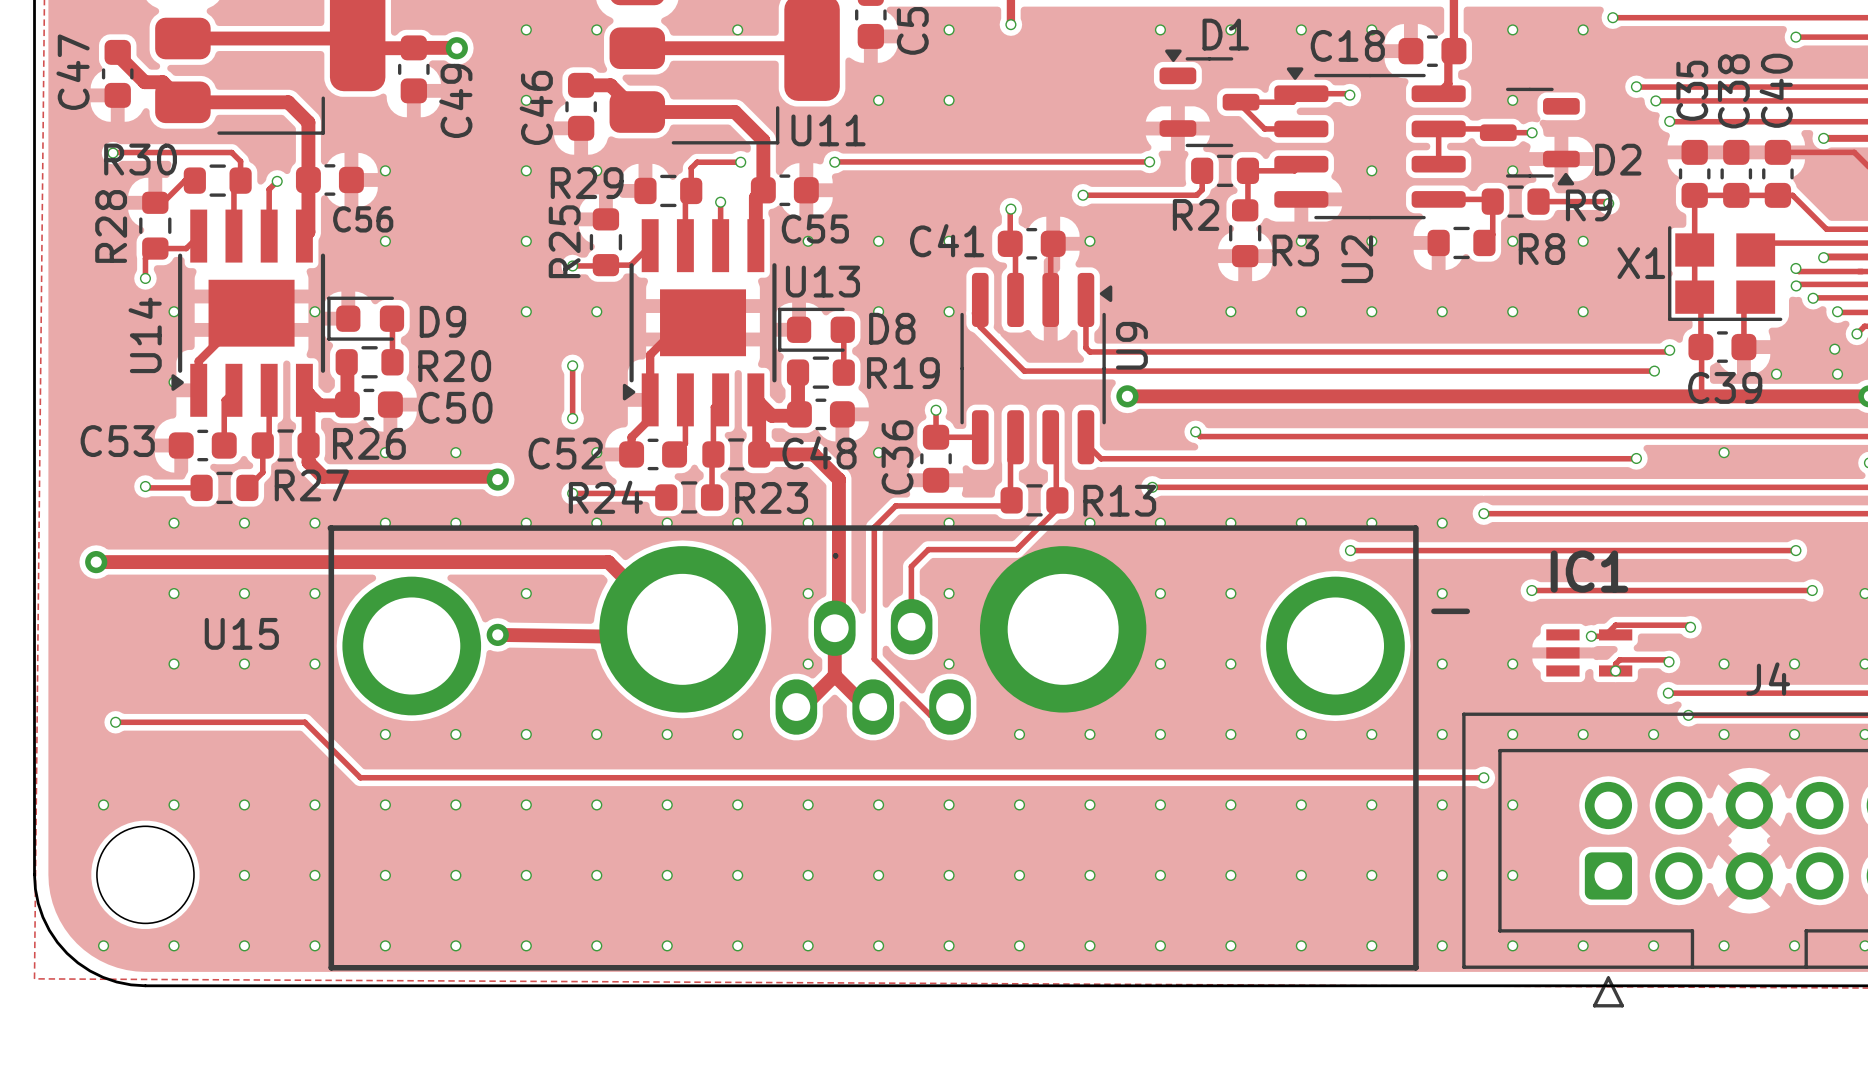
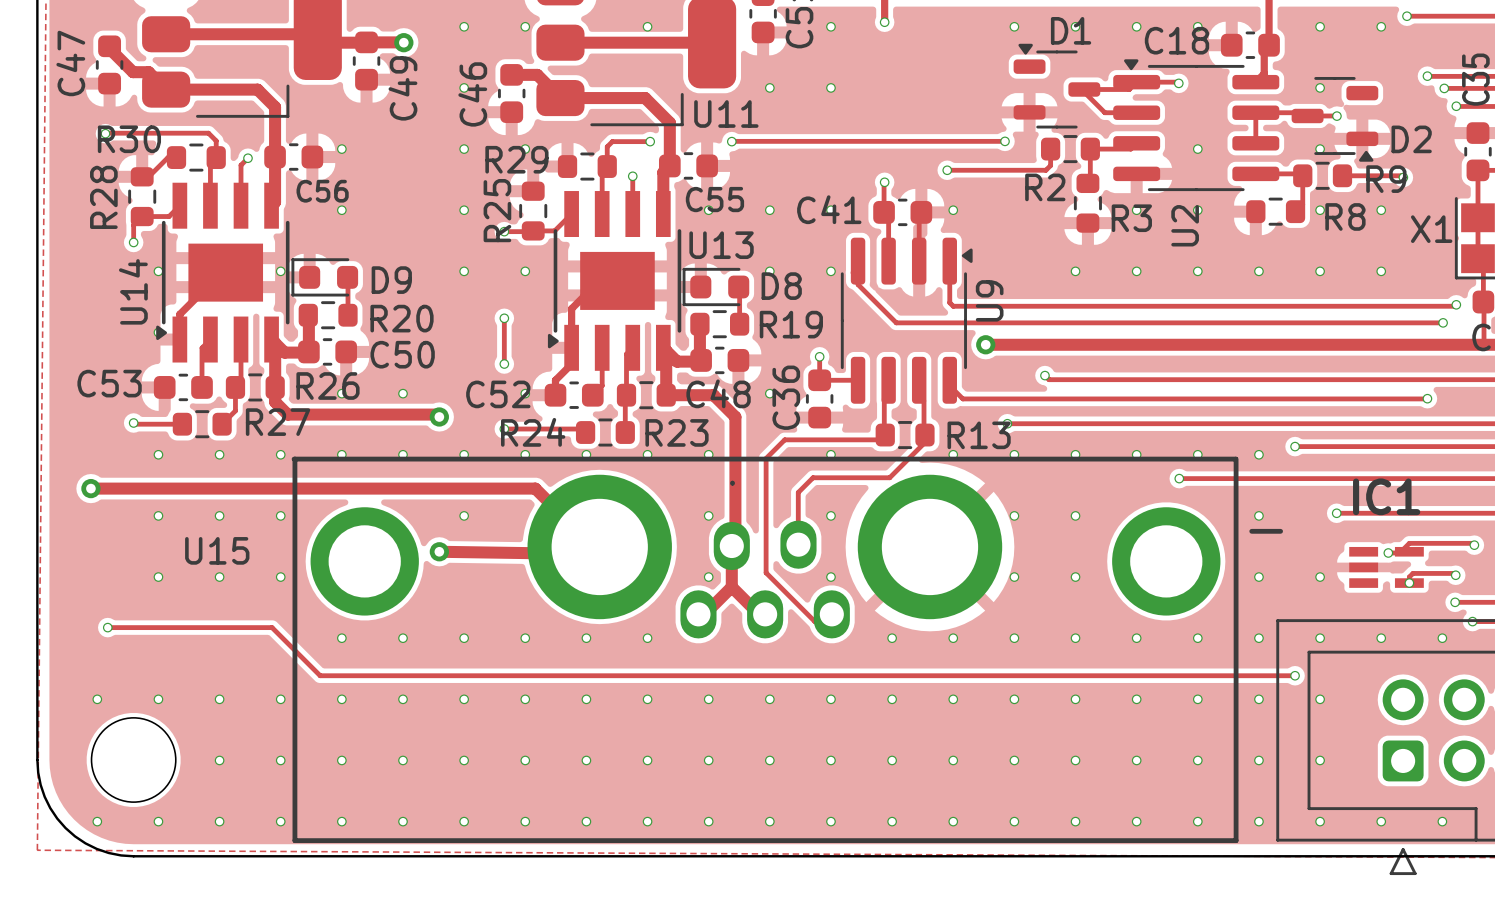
U15 footprint: [327, 525, 1419, 971] -> [291, 456, 1239, 844]

